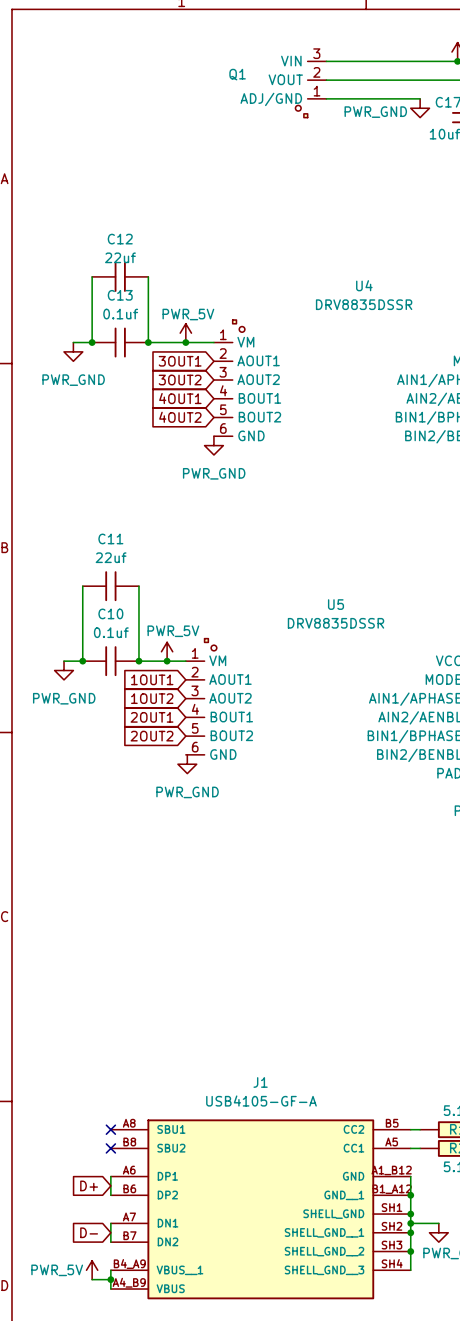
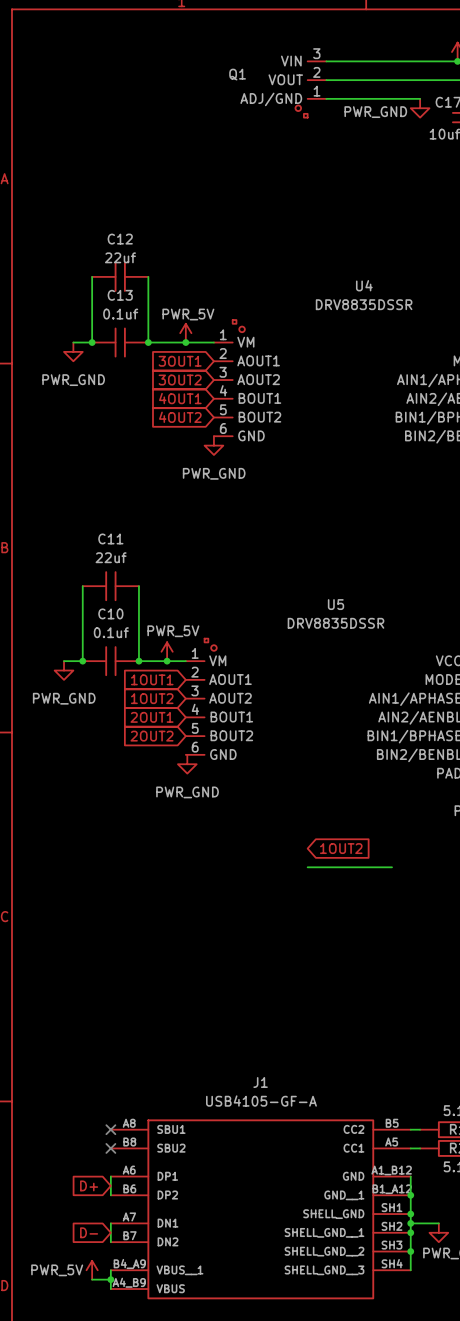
global label: none -> 1OUT2 (341, 848)
wire: none -> (307, 867) (392, 867)

